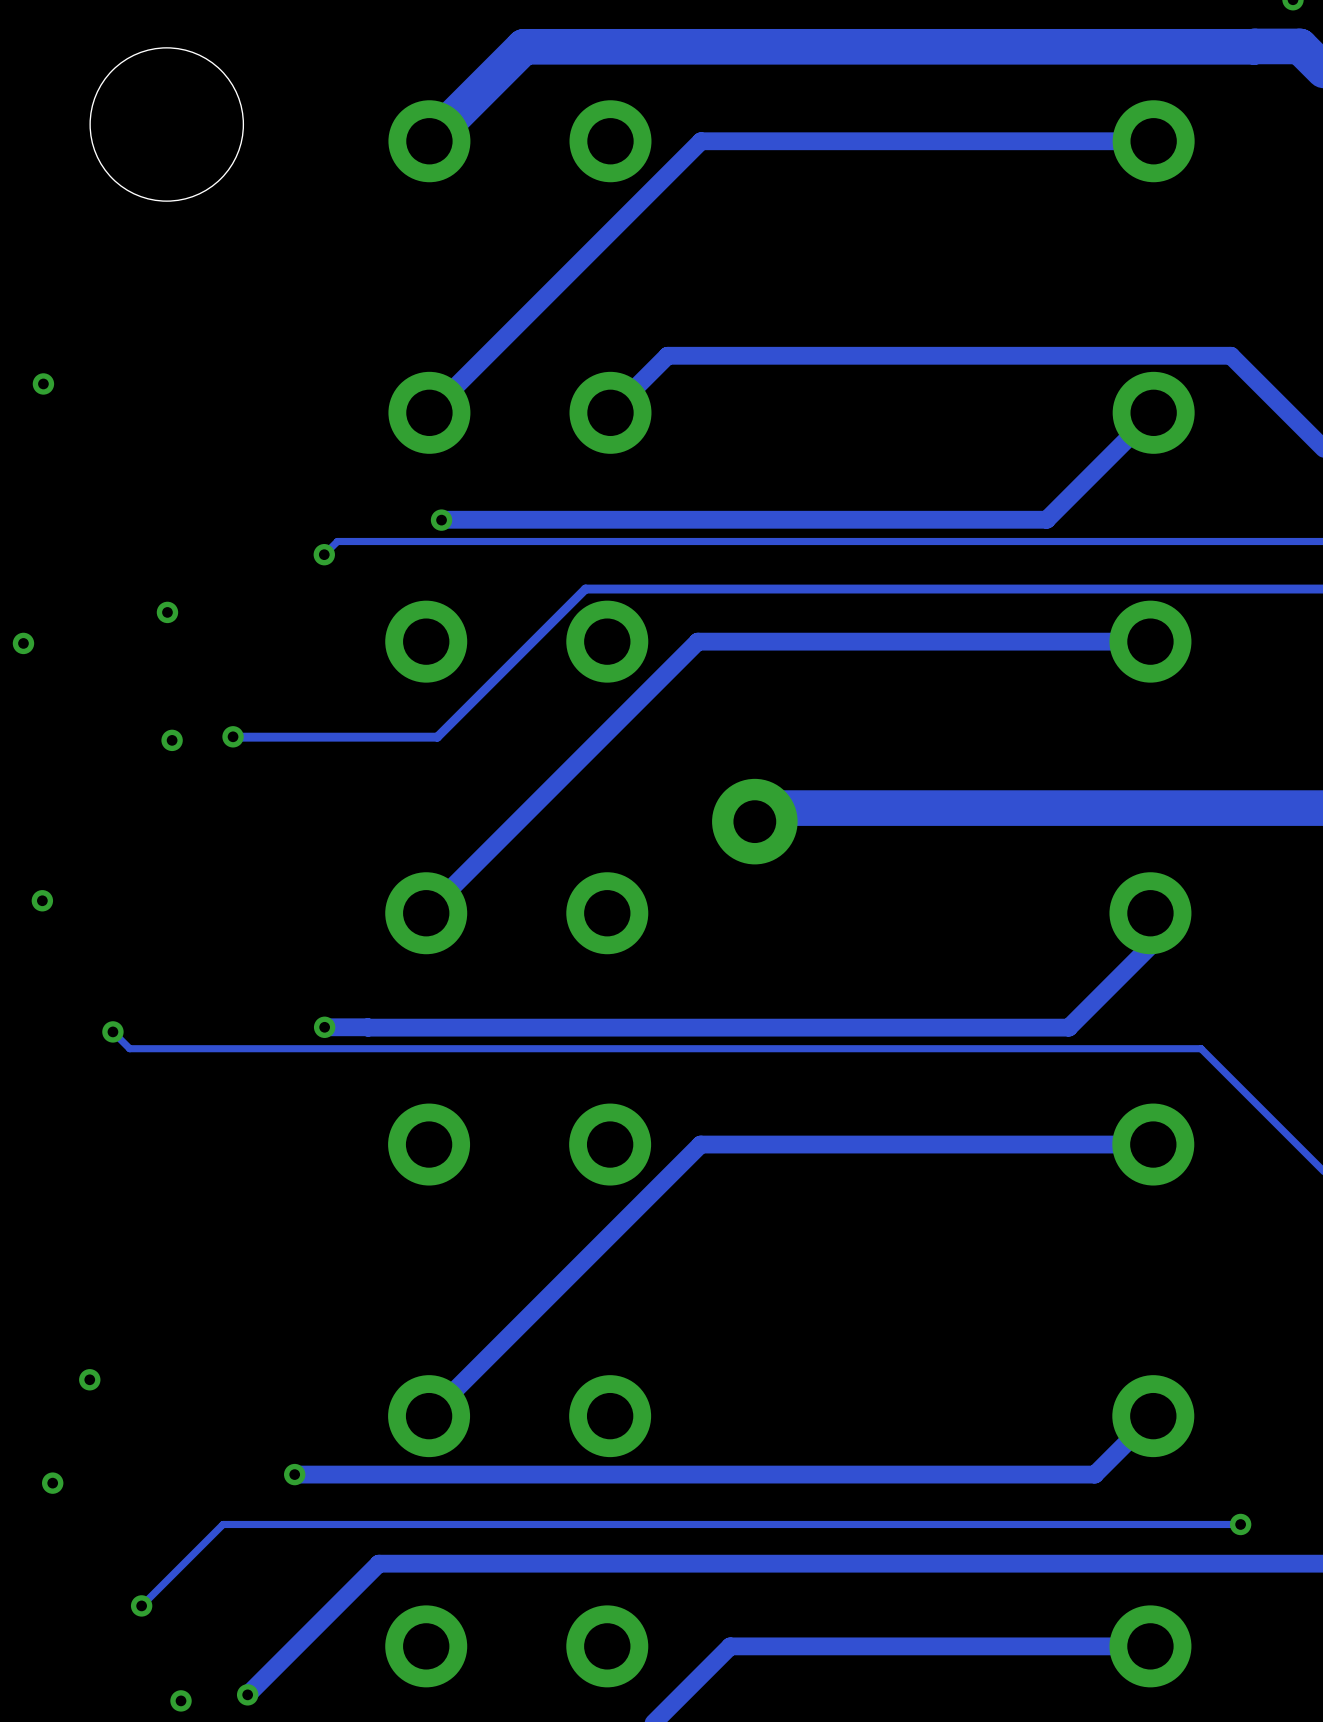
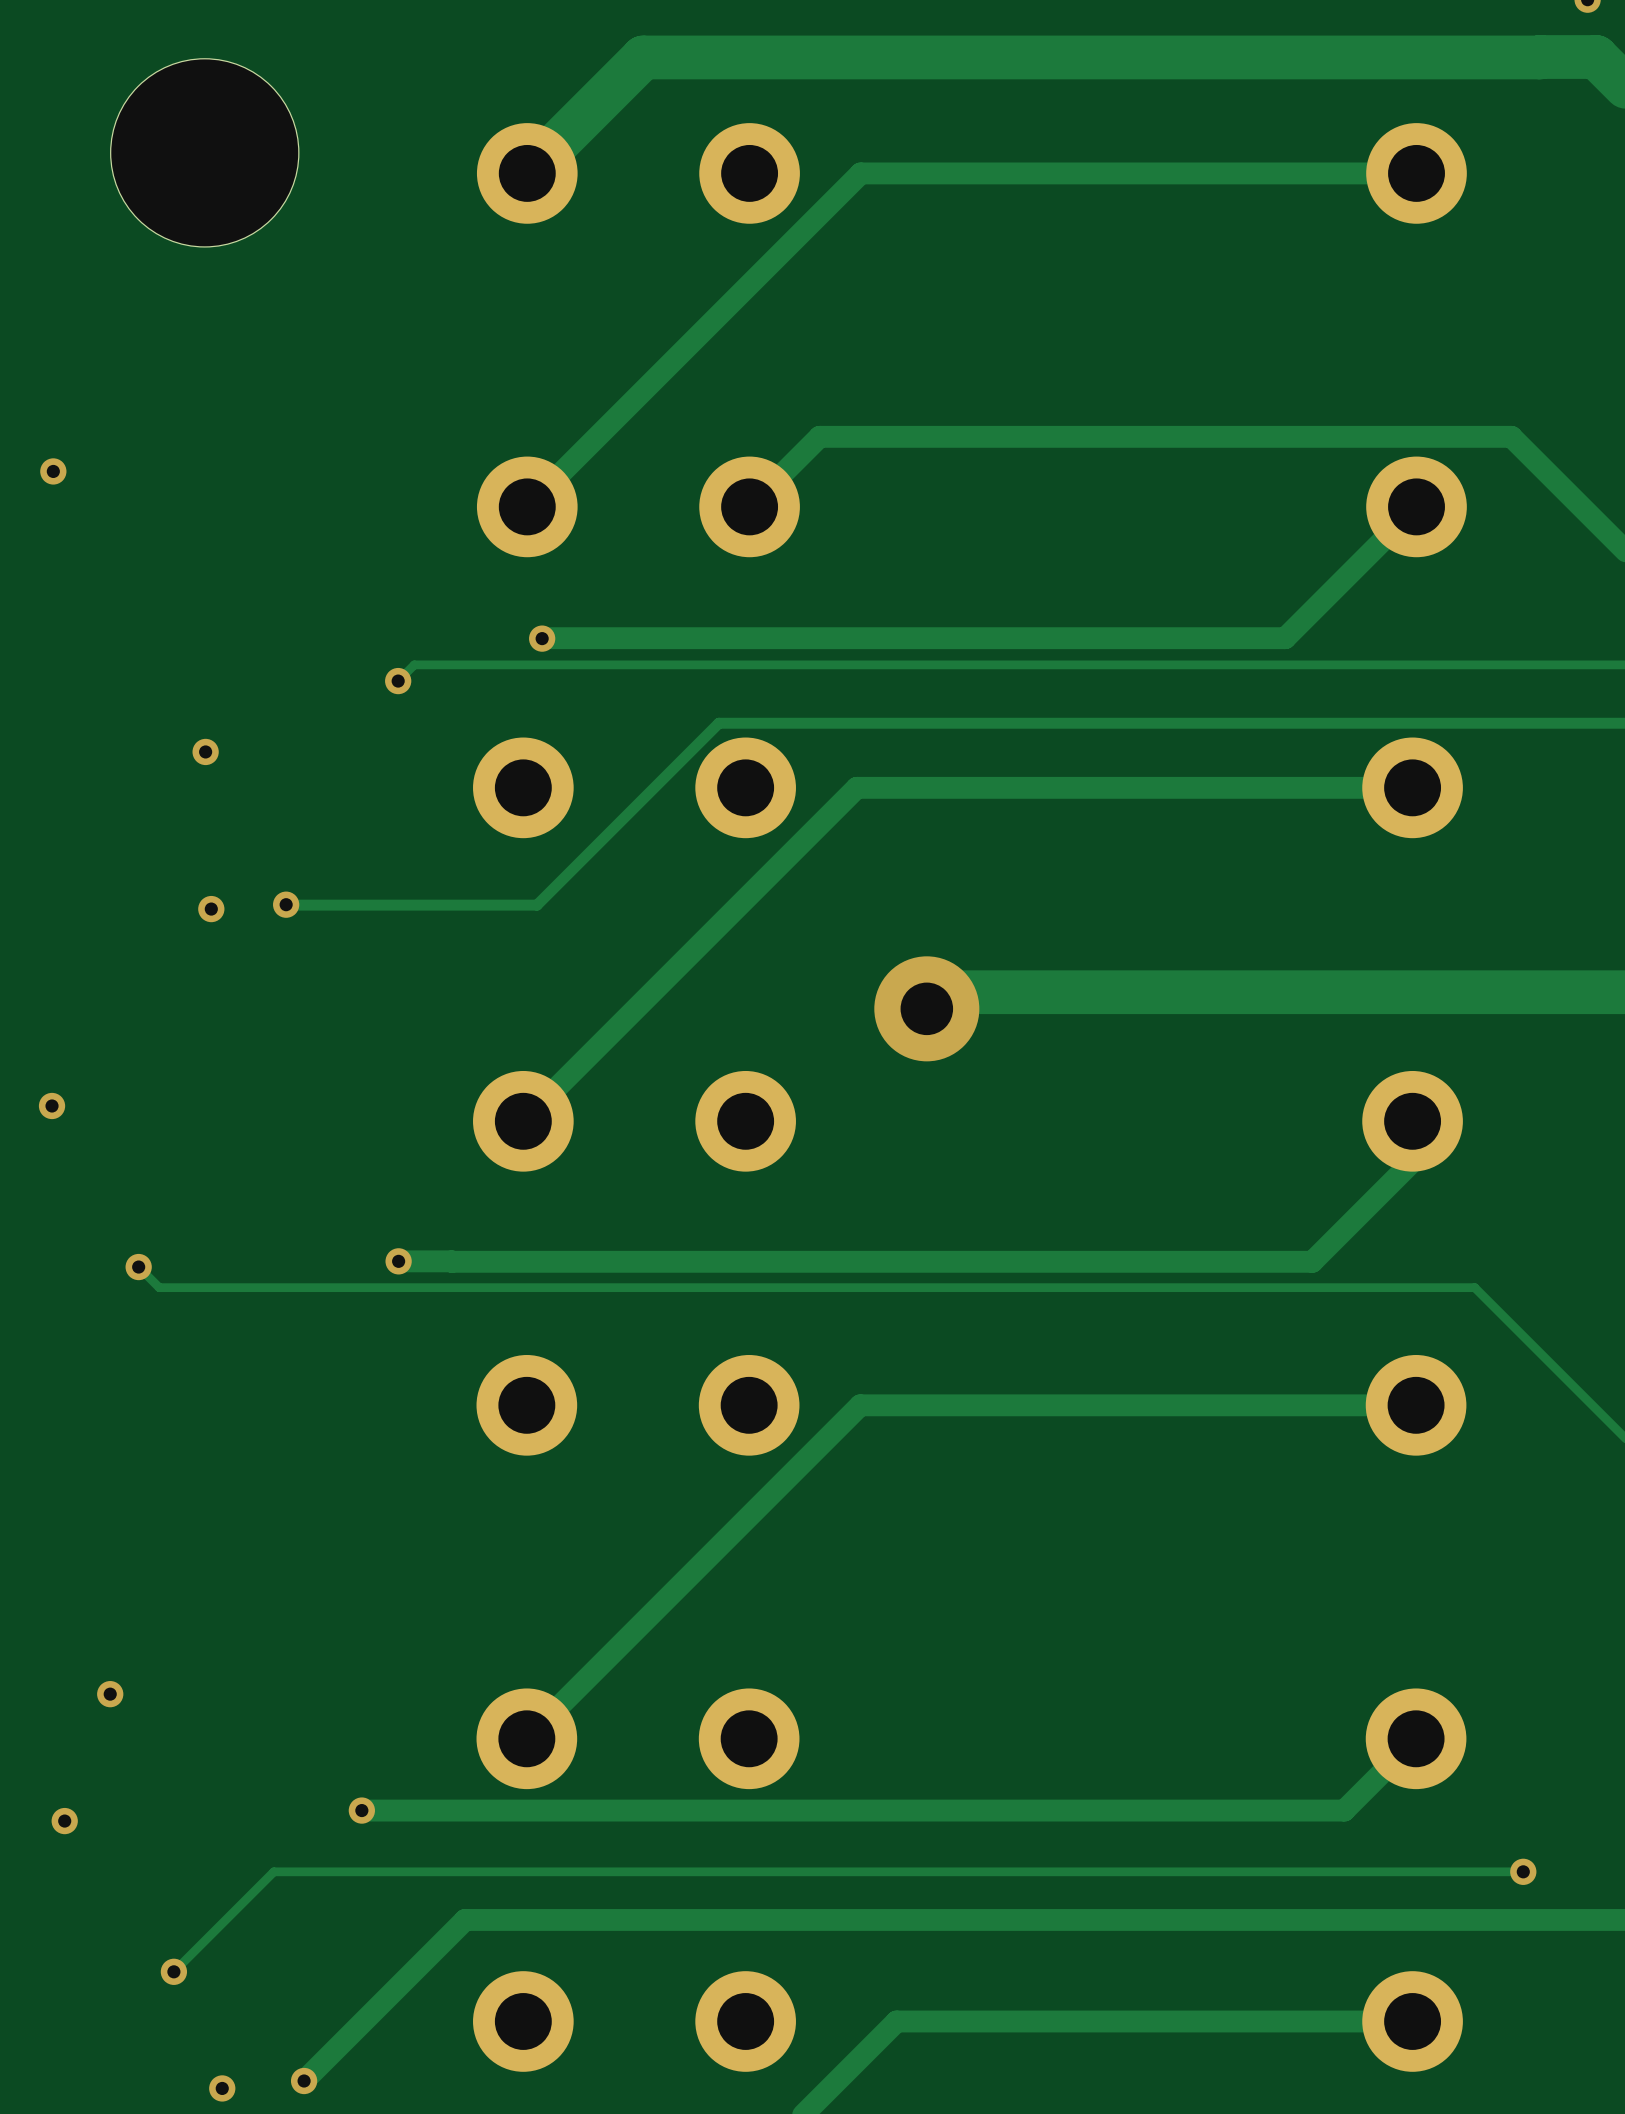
via: (23, 643) -> none

